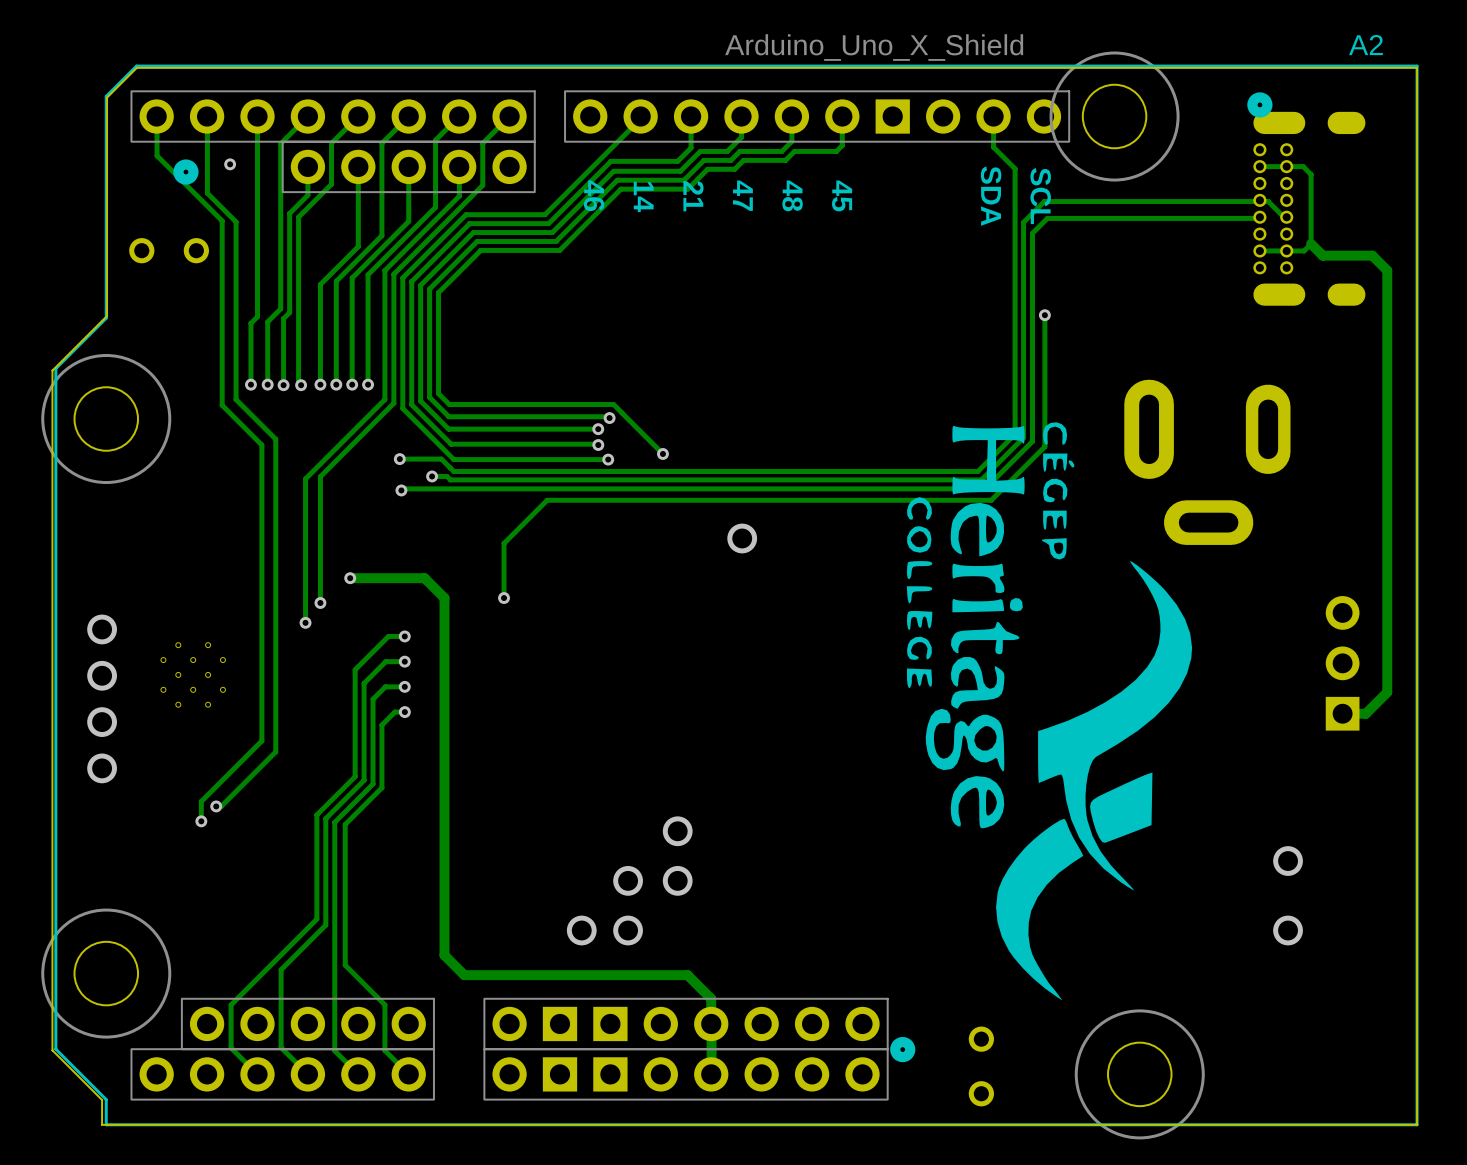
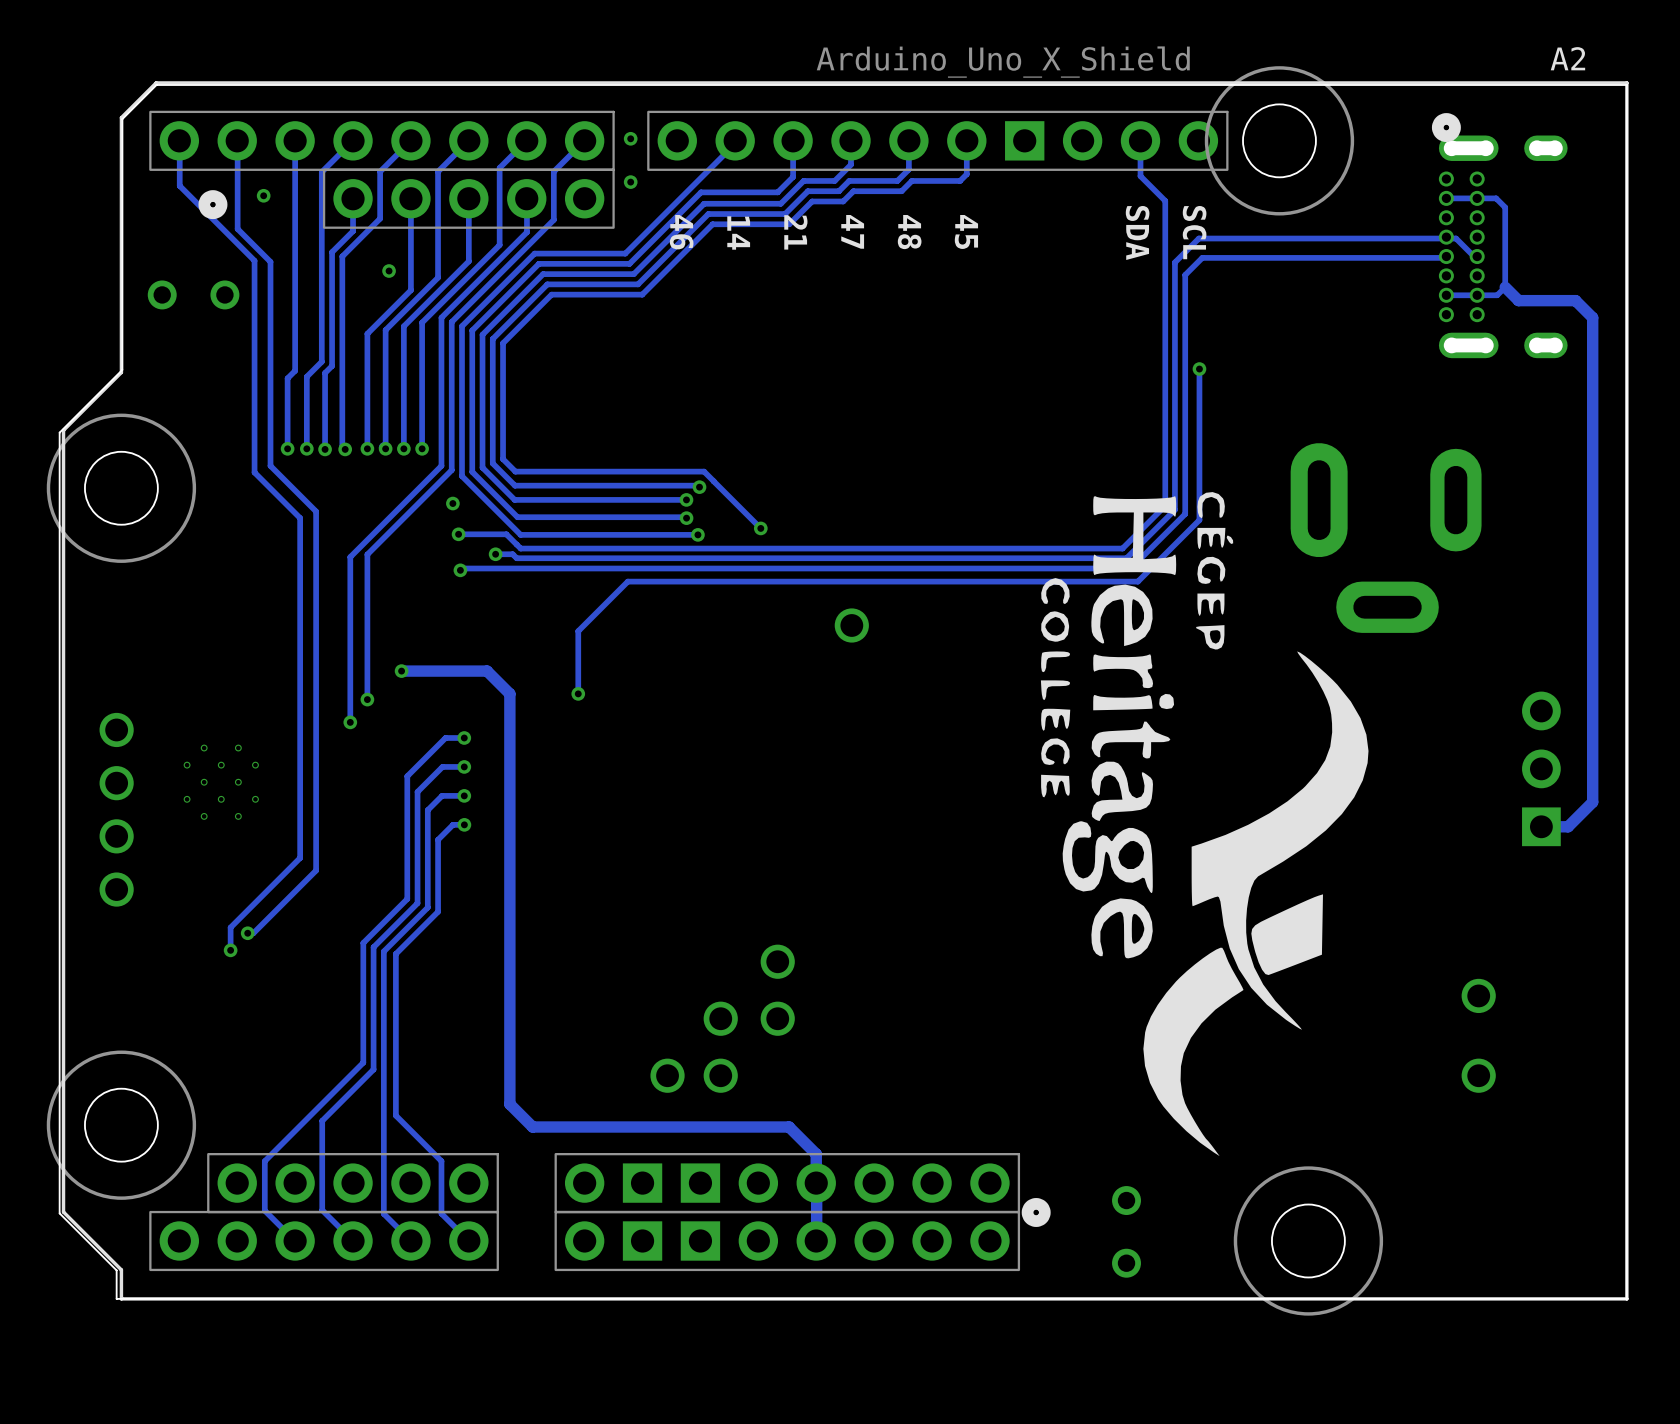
via: none -> (630, 138)
via: none -> (630, 182)
via: none -> (389, 271)
via: none -> (452, 503)

